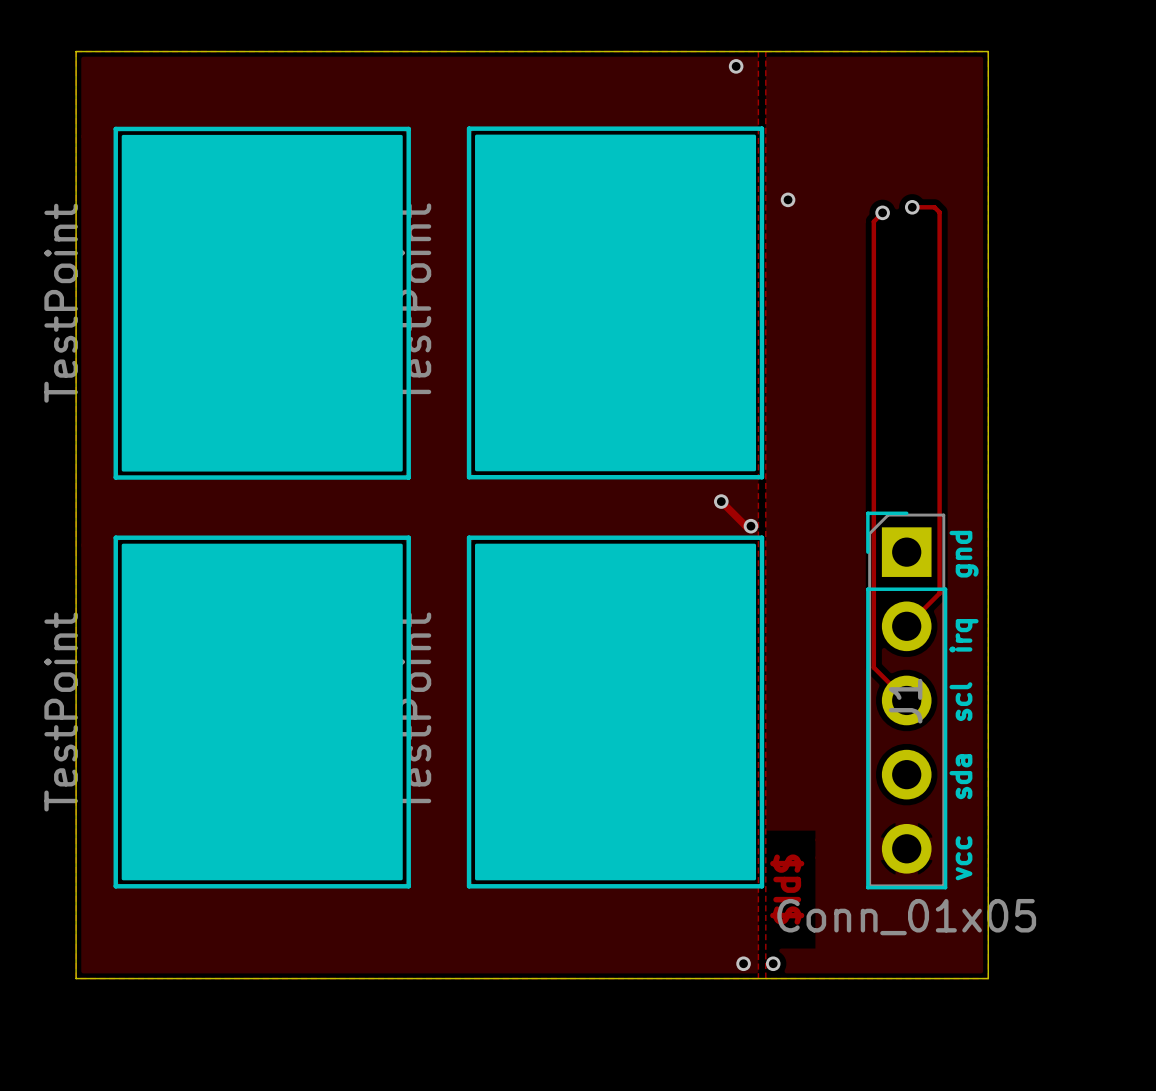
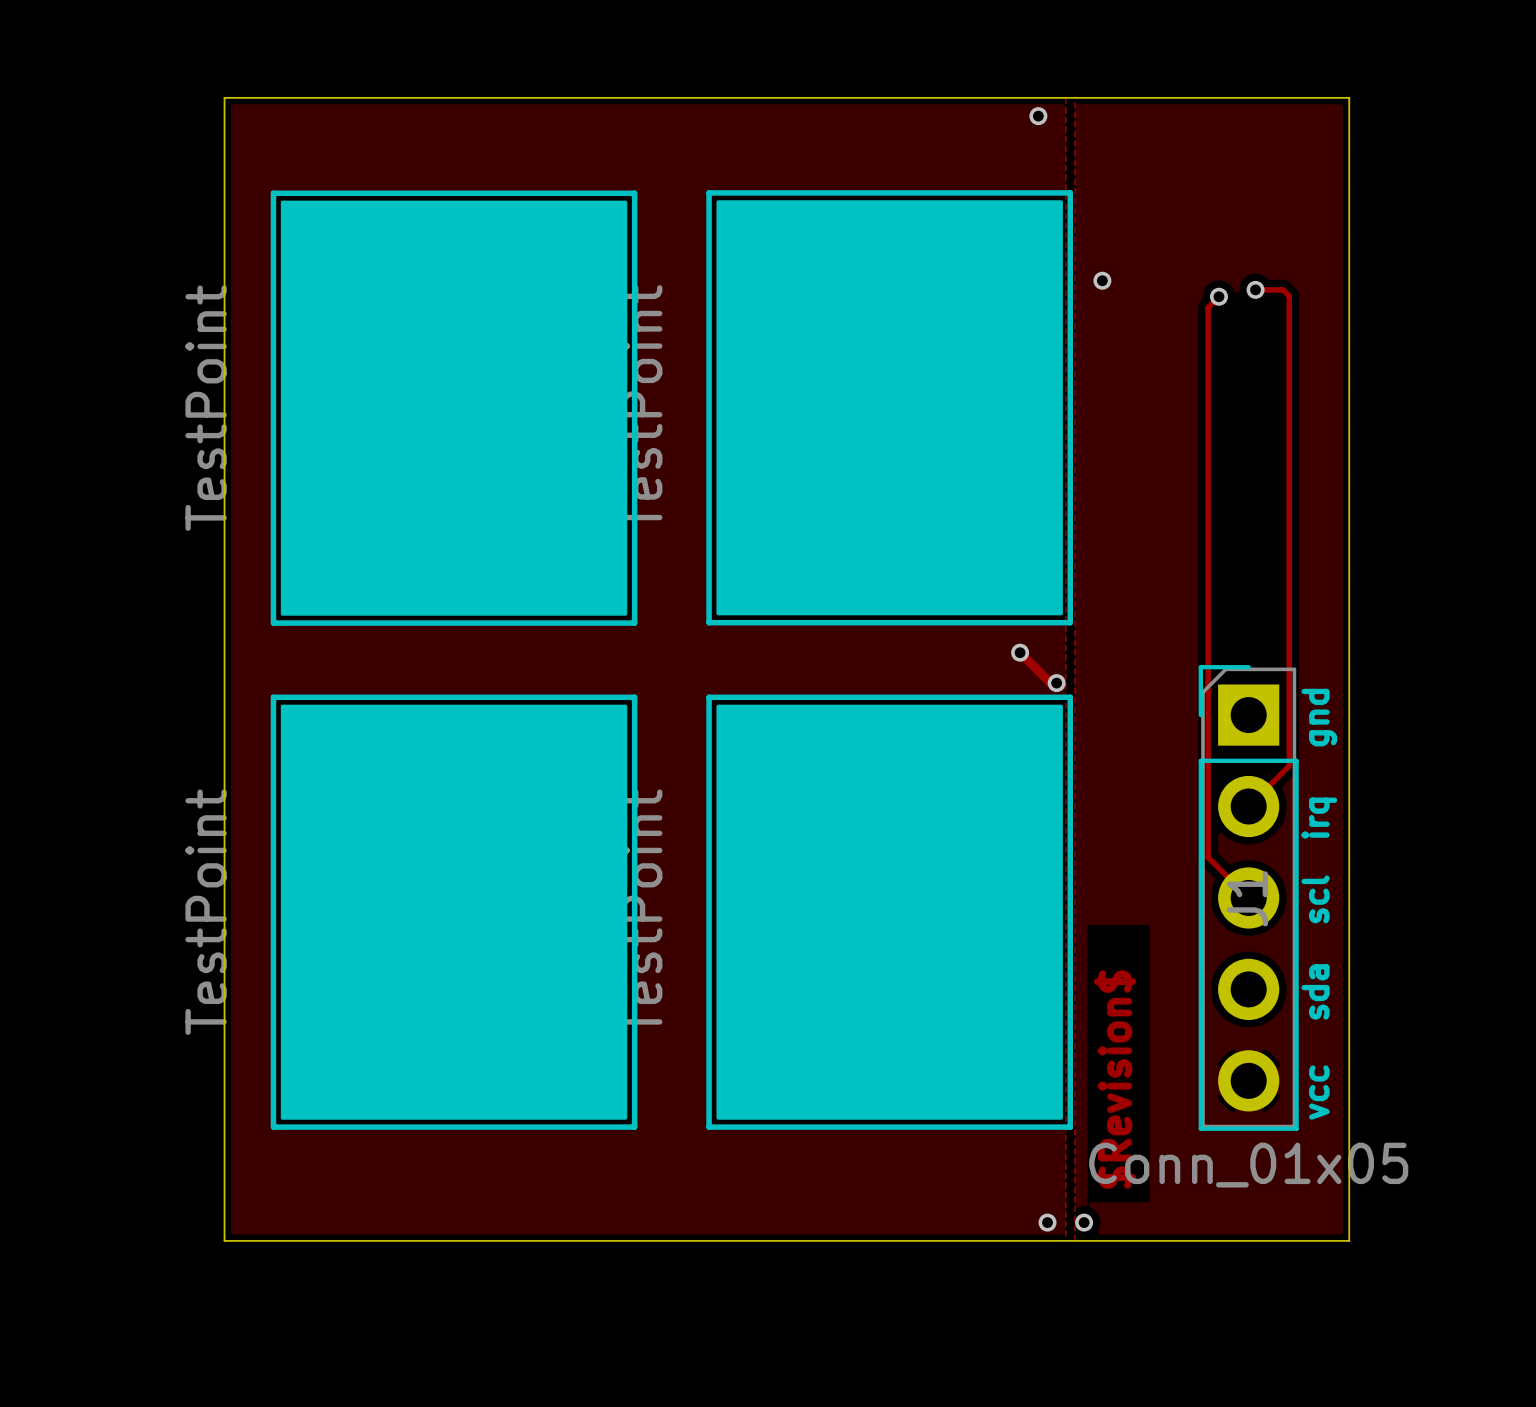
text: none -> $Revision$ (1115, 1079)
text: $Id$ (787, 889) -> none

